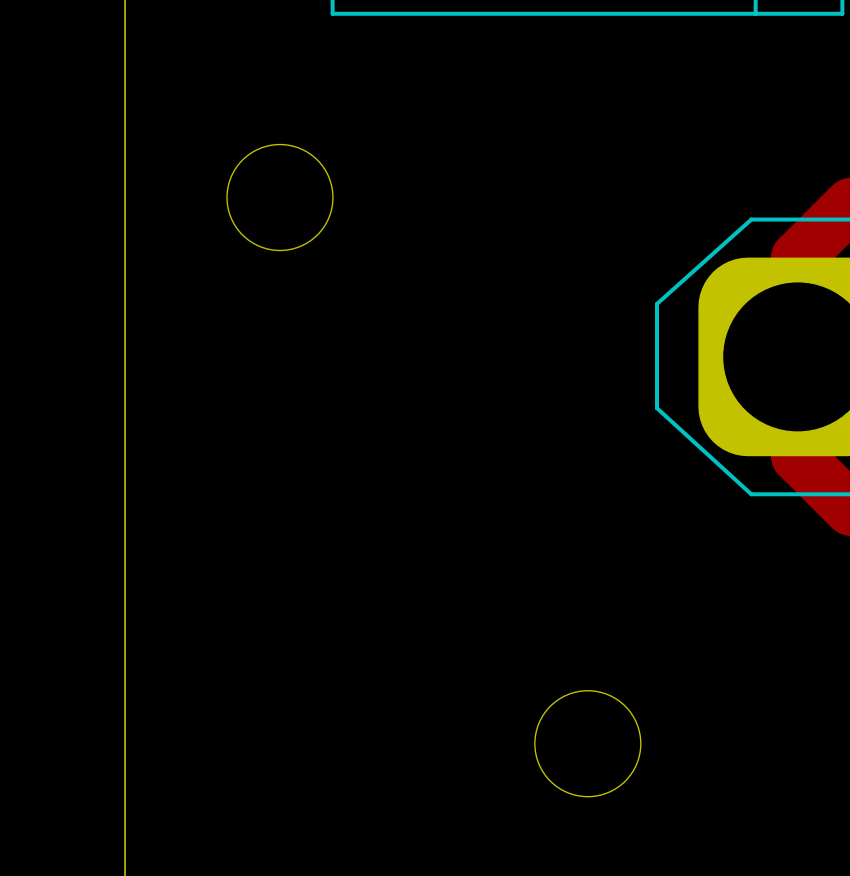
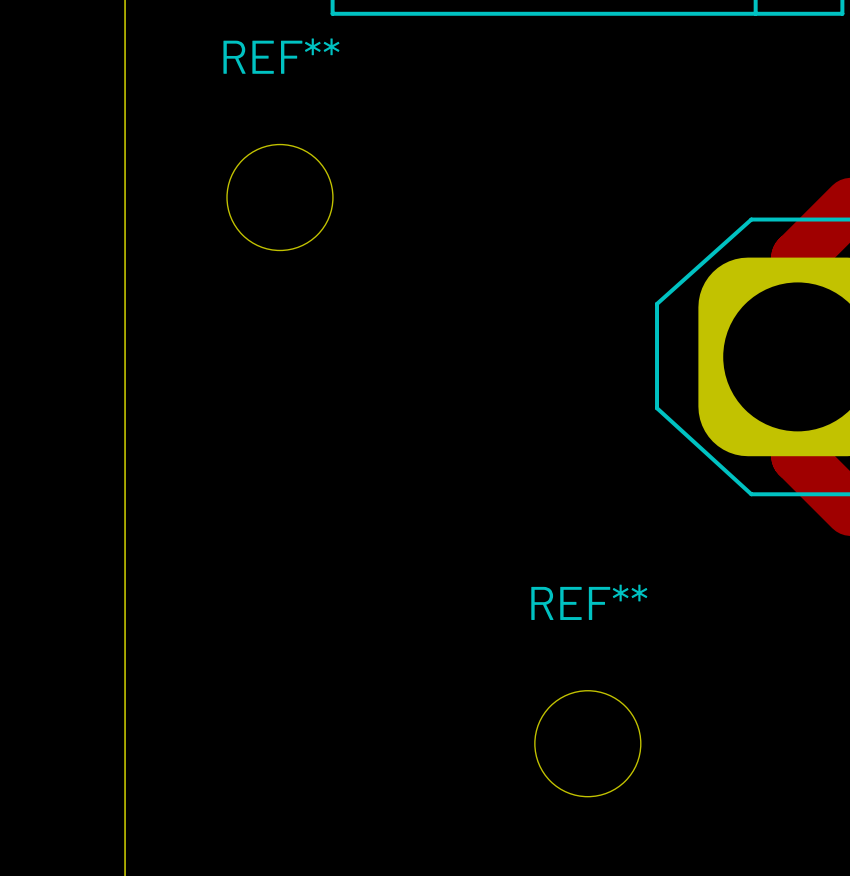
REF** name: none -> REF** (281, 56)
REF** name: none -> REF** (589, 602)

